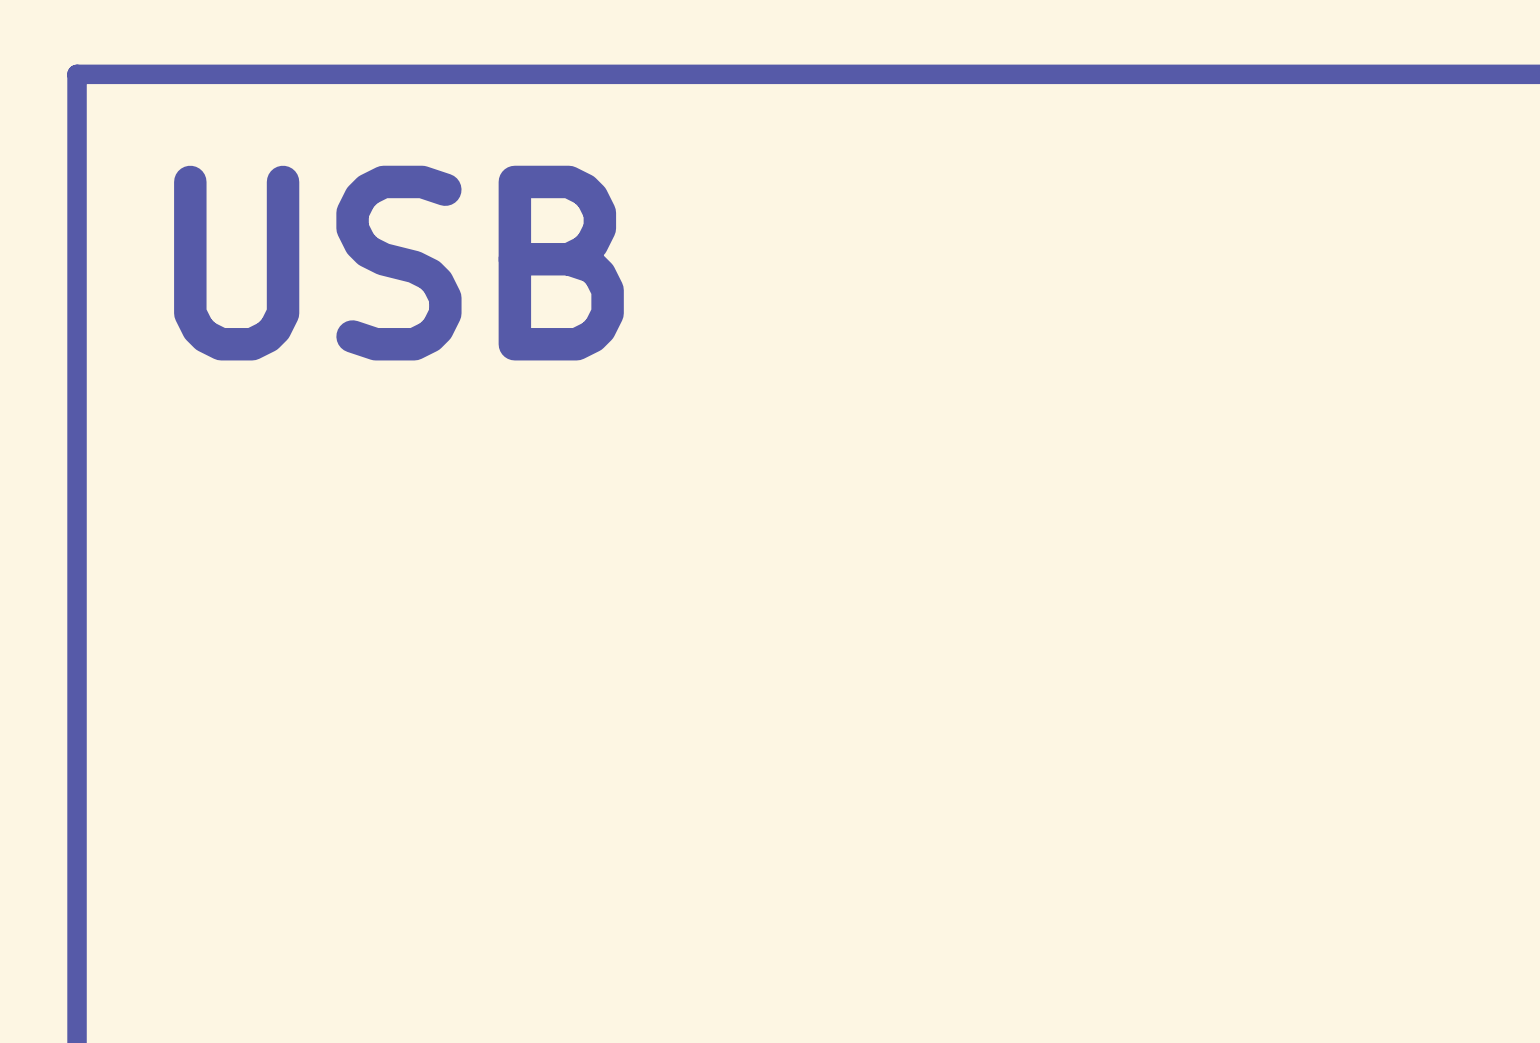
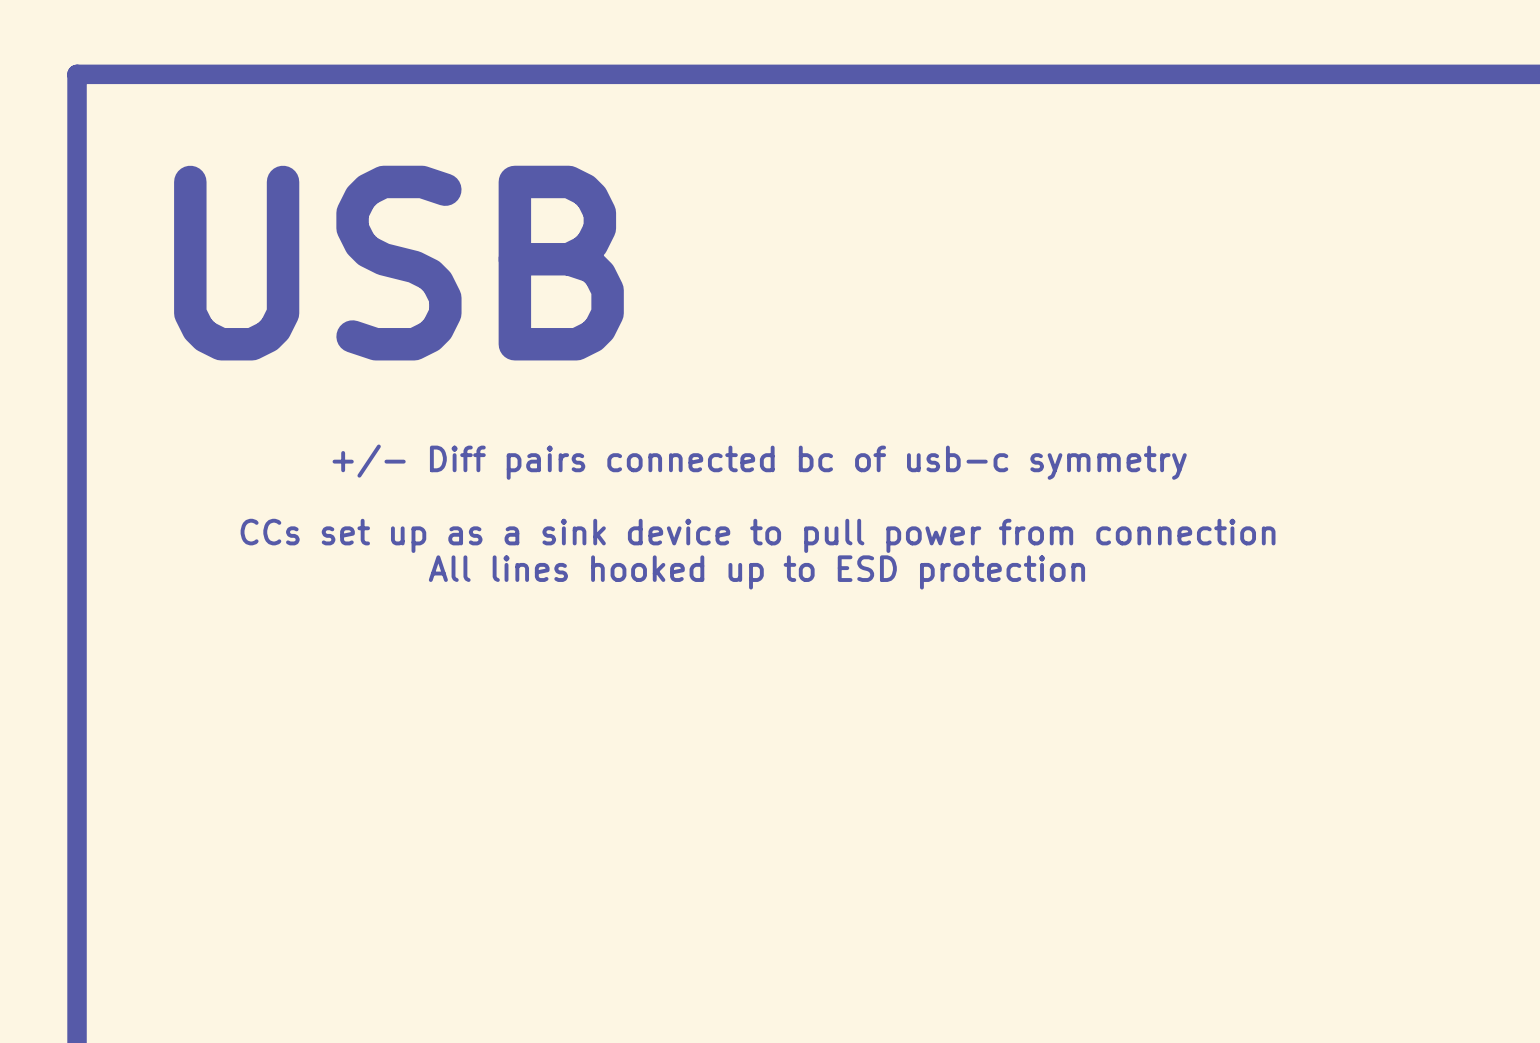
text: none -> +/- Diff pairs connected bc of usb-c symmetry (759, 462)
text: none -> CCs set up as a sink device to pull power from connection (758, 535)
text: none -> All lines hooked up to ESD protection (756, 572)

